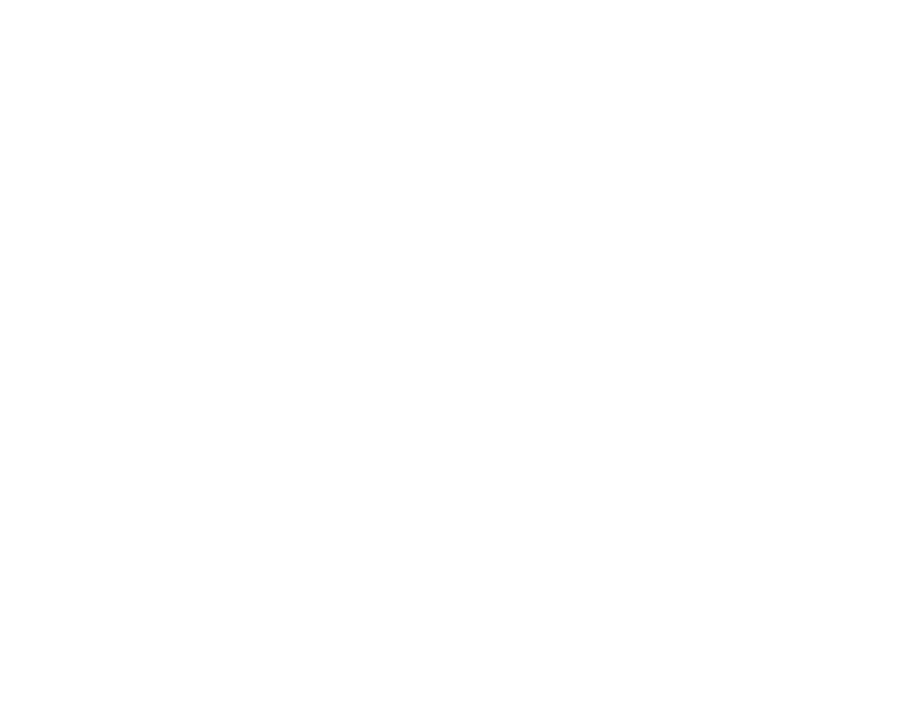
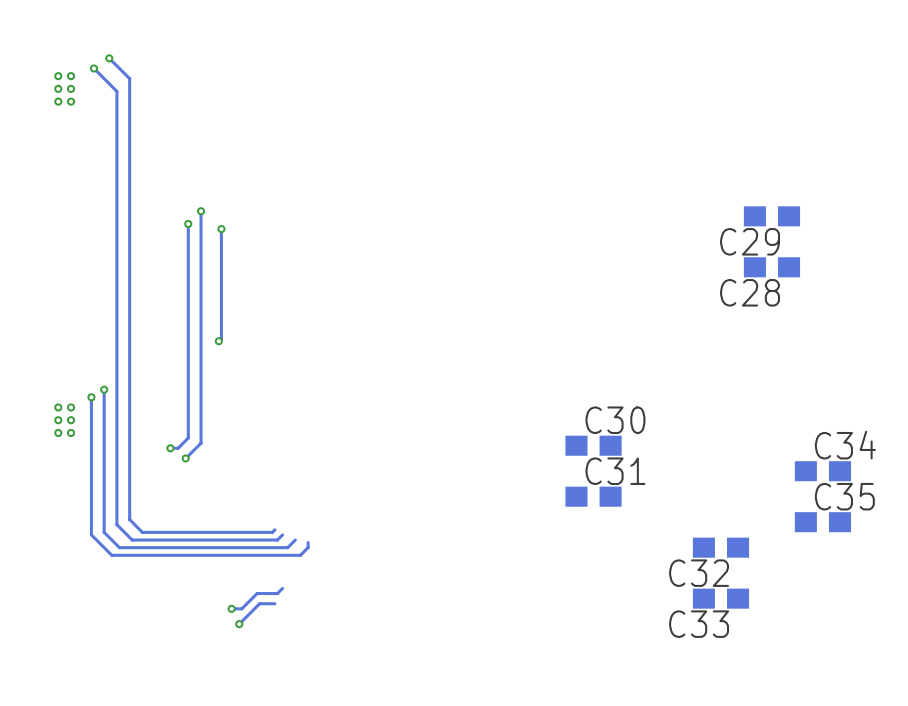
track: none -> (109, 58) (129, 78) (129, 519) (142, 532) (272, 532) (274, 529)
via: none -> (109, 58)
track: none -> (93, 68) (116, 91) (116, 524) (132, 540) (277, 540) (282, 534)
via: none -> (93, 68)
via: none -> (58, 76)
via: none -> (71, 76)
via: none -> (58, 88)
via: none -> (71, 88)
via: none -> (58, 101)
via: none -> (71, 101)
track: none -> (201, 211) (201, 443) (185, 458)
via: none -> (201, 211)
C29: none -> (771, 216)
track: none -> (188, 223) (188, 438) (178, 448) (170, 448)
via: none -> (188, 223)
track: none -> (221, 229) (221, 338) (218, 341)
via: none -> (221, 229)
C28: none -> (771, 267)
via: none -> (218, 341)
track: none -> (104, 389) (104, 532) (119, 547) (287, 547) (295, 540)
via: none -> (104, 389)
track: none -> (91, 397) (91, 534) (111, 555) (300, 555) (308, 547) (308, 542)
via: none -> (91, 397)
via: none -> (58, 407)
via: none -> (71, 407)
via: none -> (58, 420)
via: none -> (71, 420)
via: none -> (58, 432)
via: none -> (71, 432)
C30: none -> (593, 445)
via: none -> (170, 448)
via: none -> (185, 458)
C34: none -> (822, 471)
C31: none -> (593, 496)
C35: none -> (822, 522)
C32: none -> (720, 547)
track: none -> (282, 588) (277, 593) (257, 593) (241, 608) (231, 608)
C33: none -> (720, 598)
track: none -> (274, 603) (259, 603) (239, 624)
via: none -> (231, 608)
via: none -> (239, 624)

